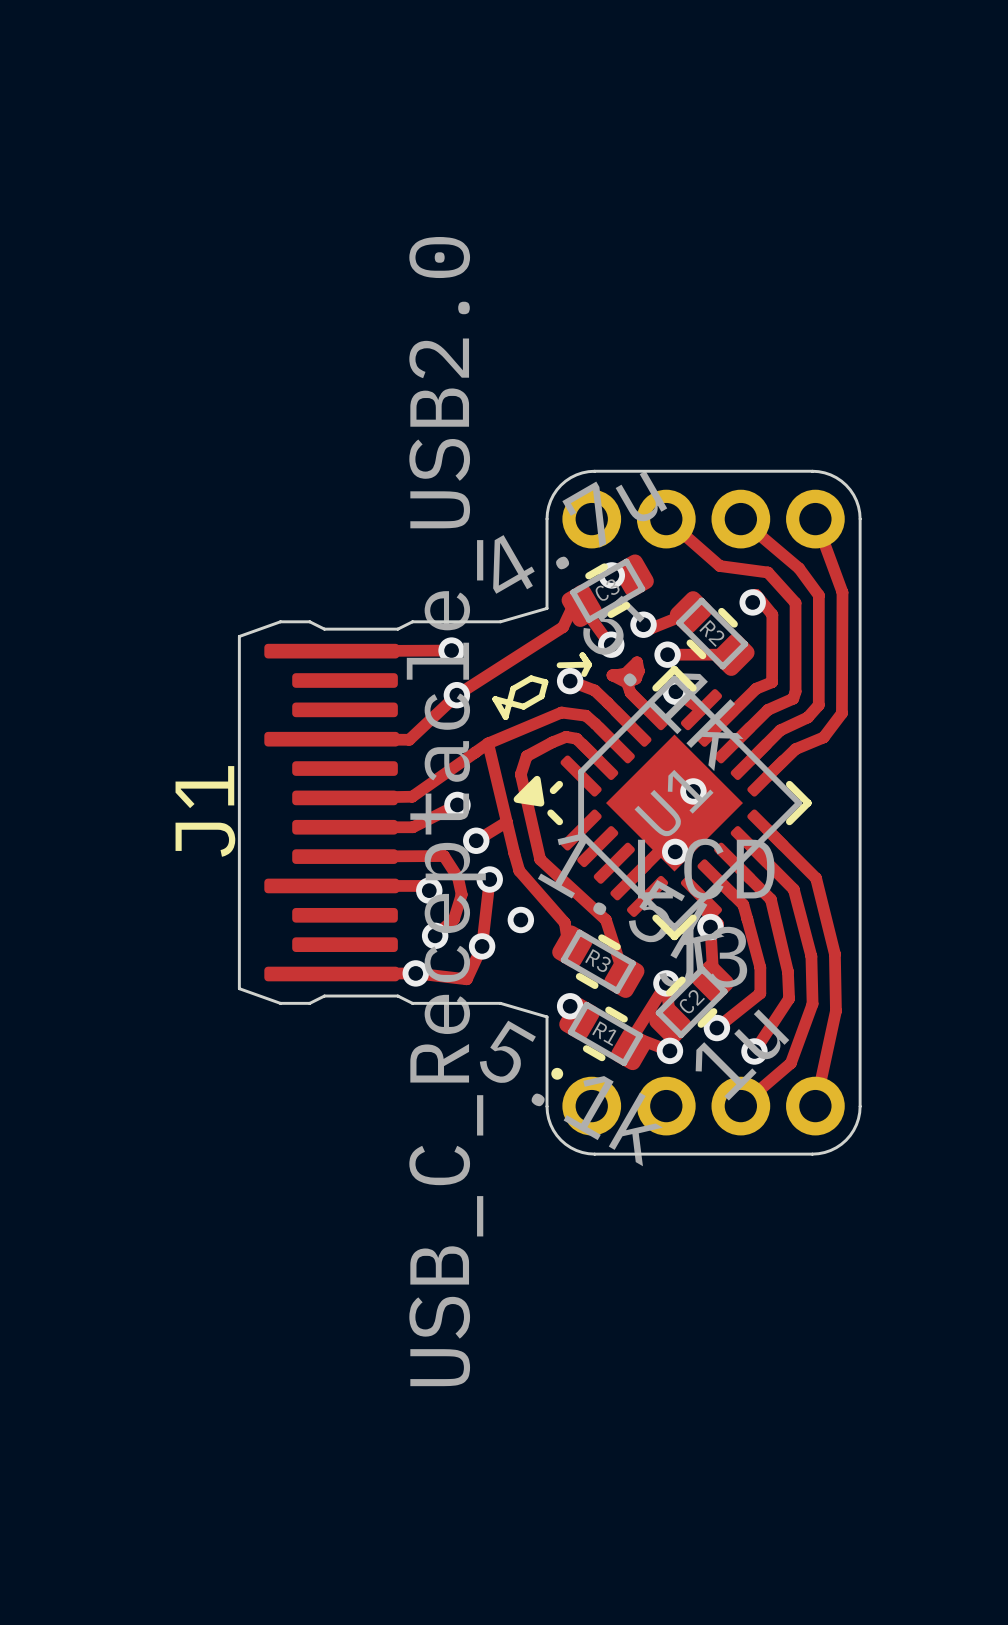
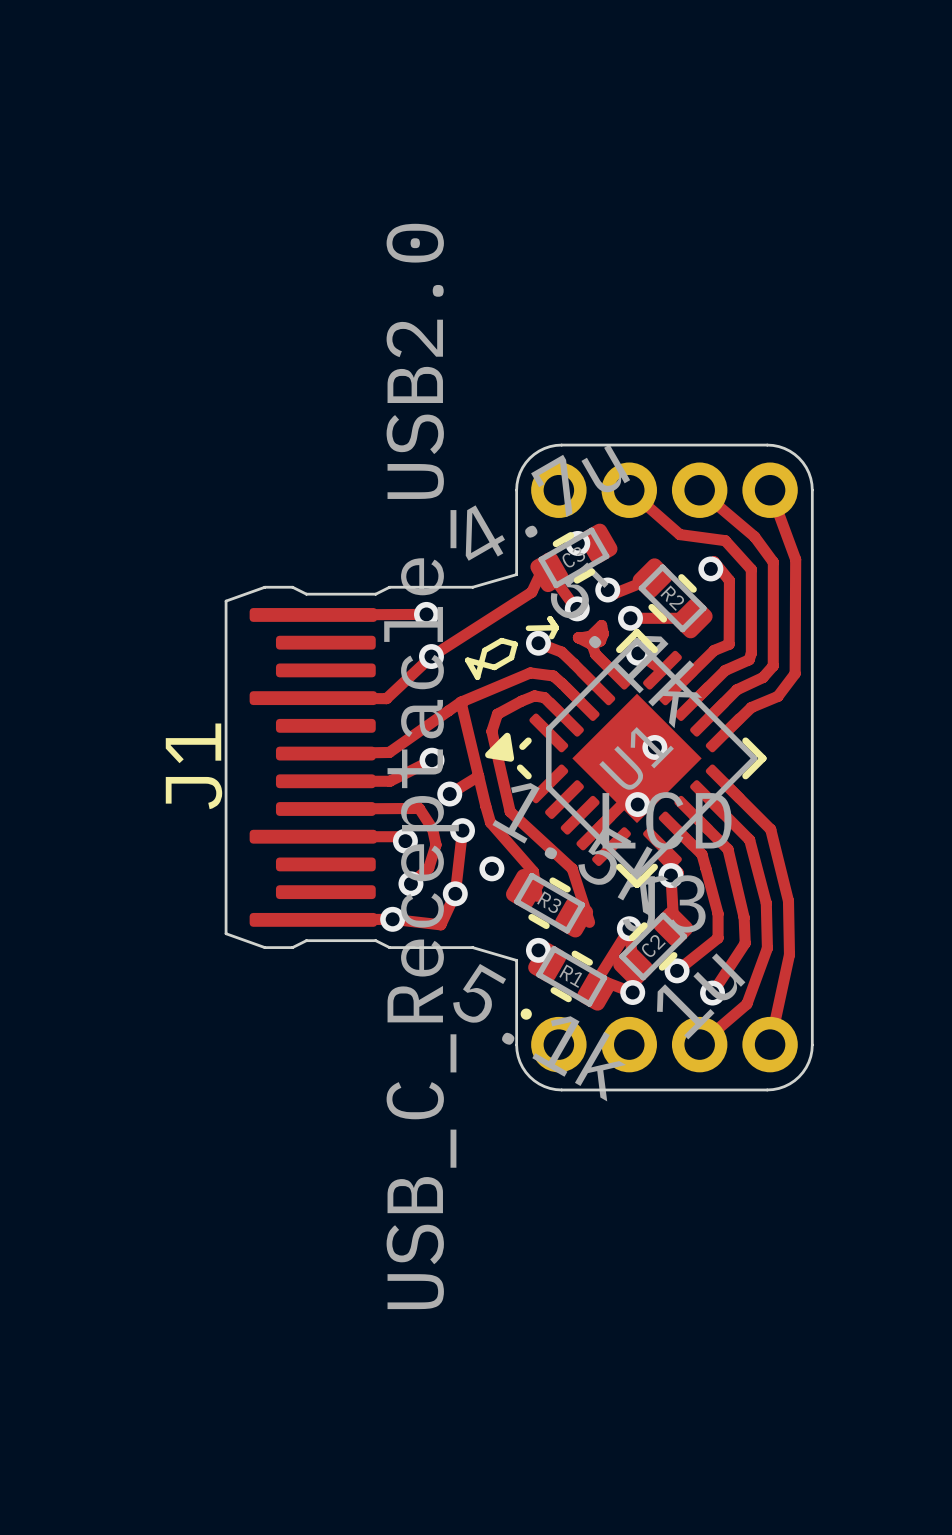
R3 position: (598, 961) -> (549, 903)

